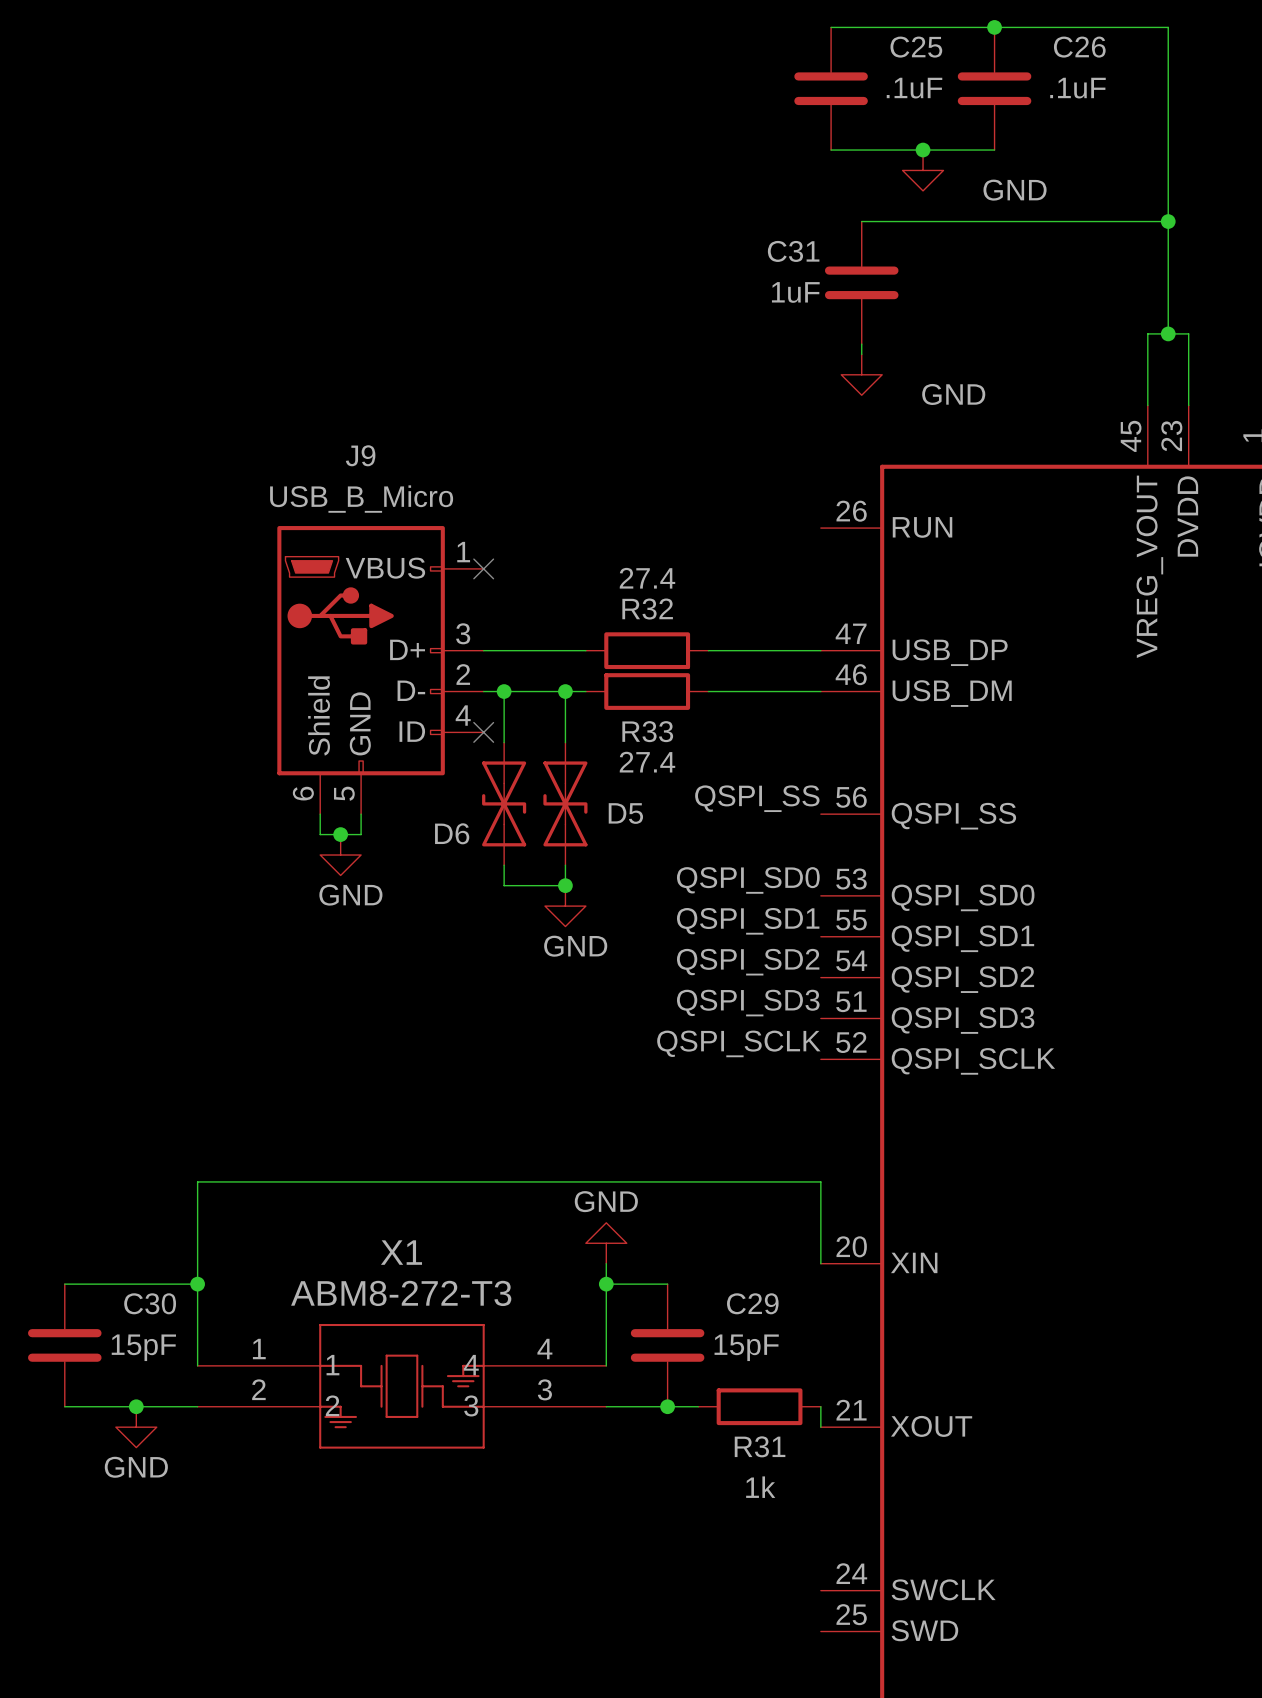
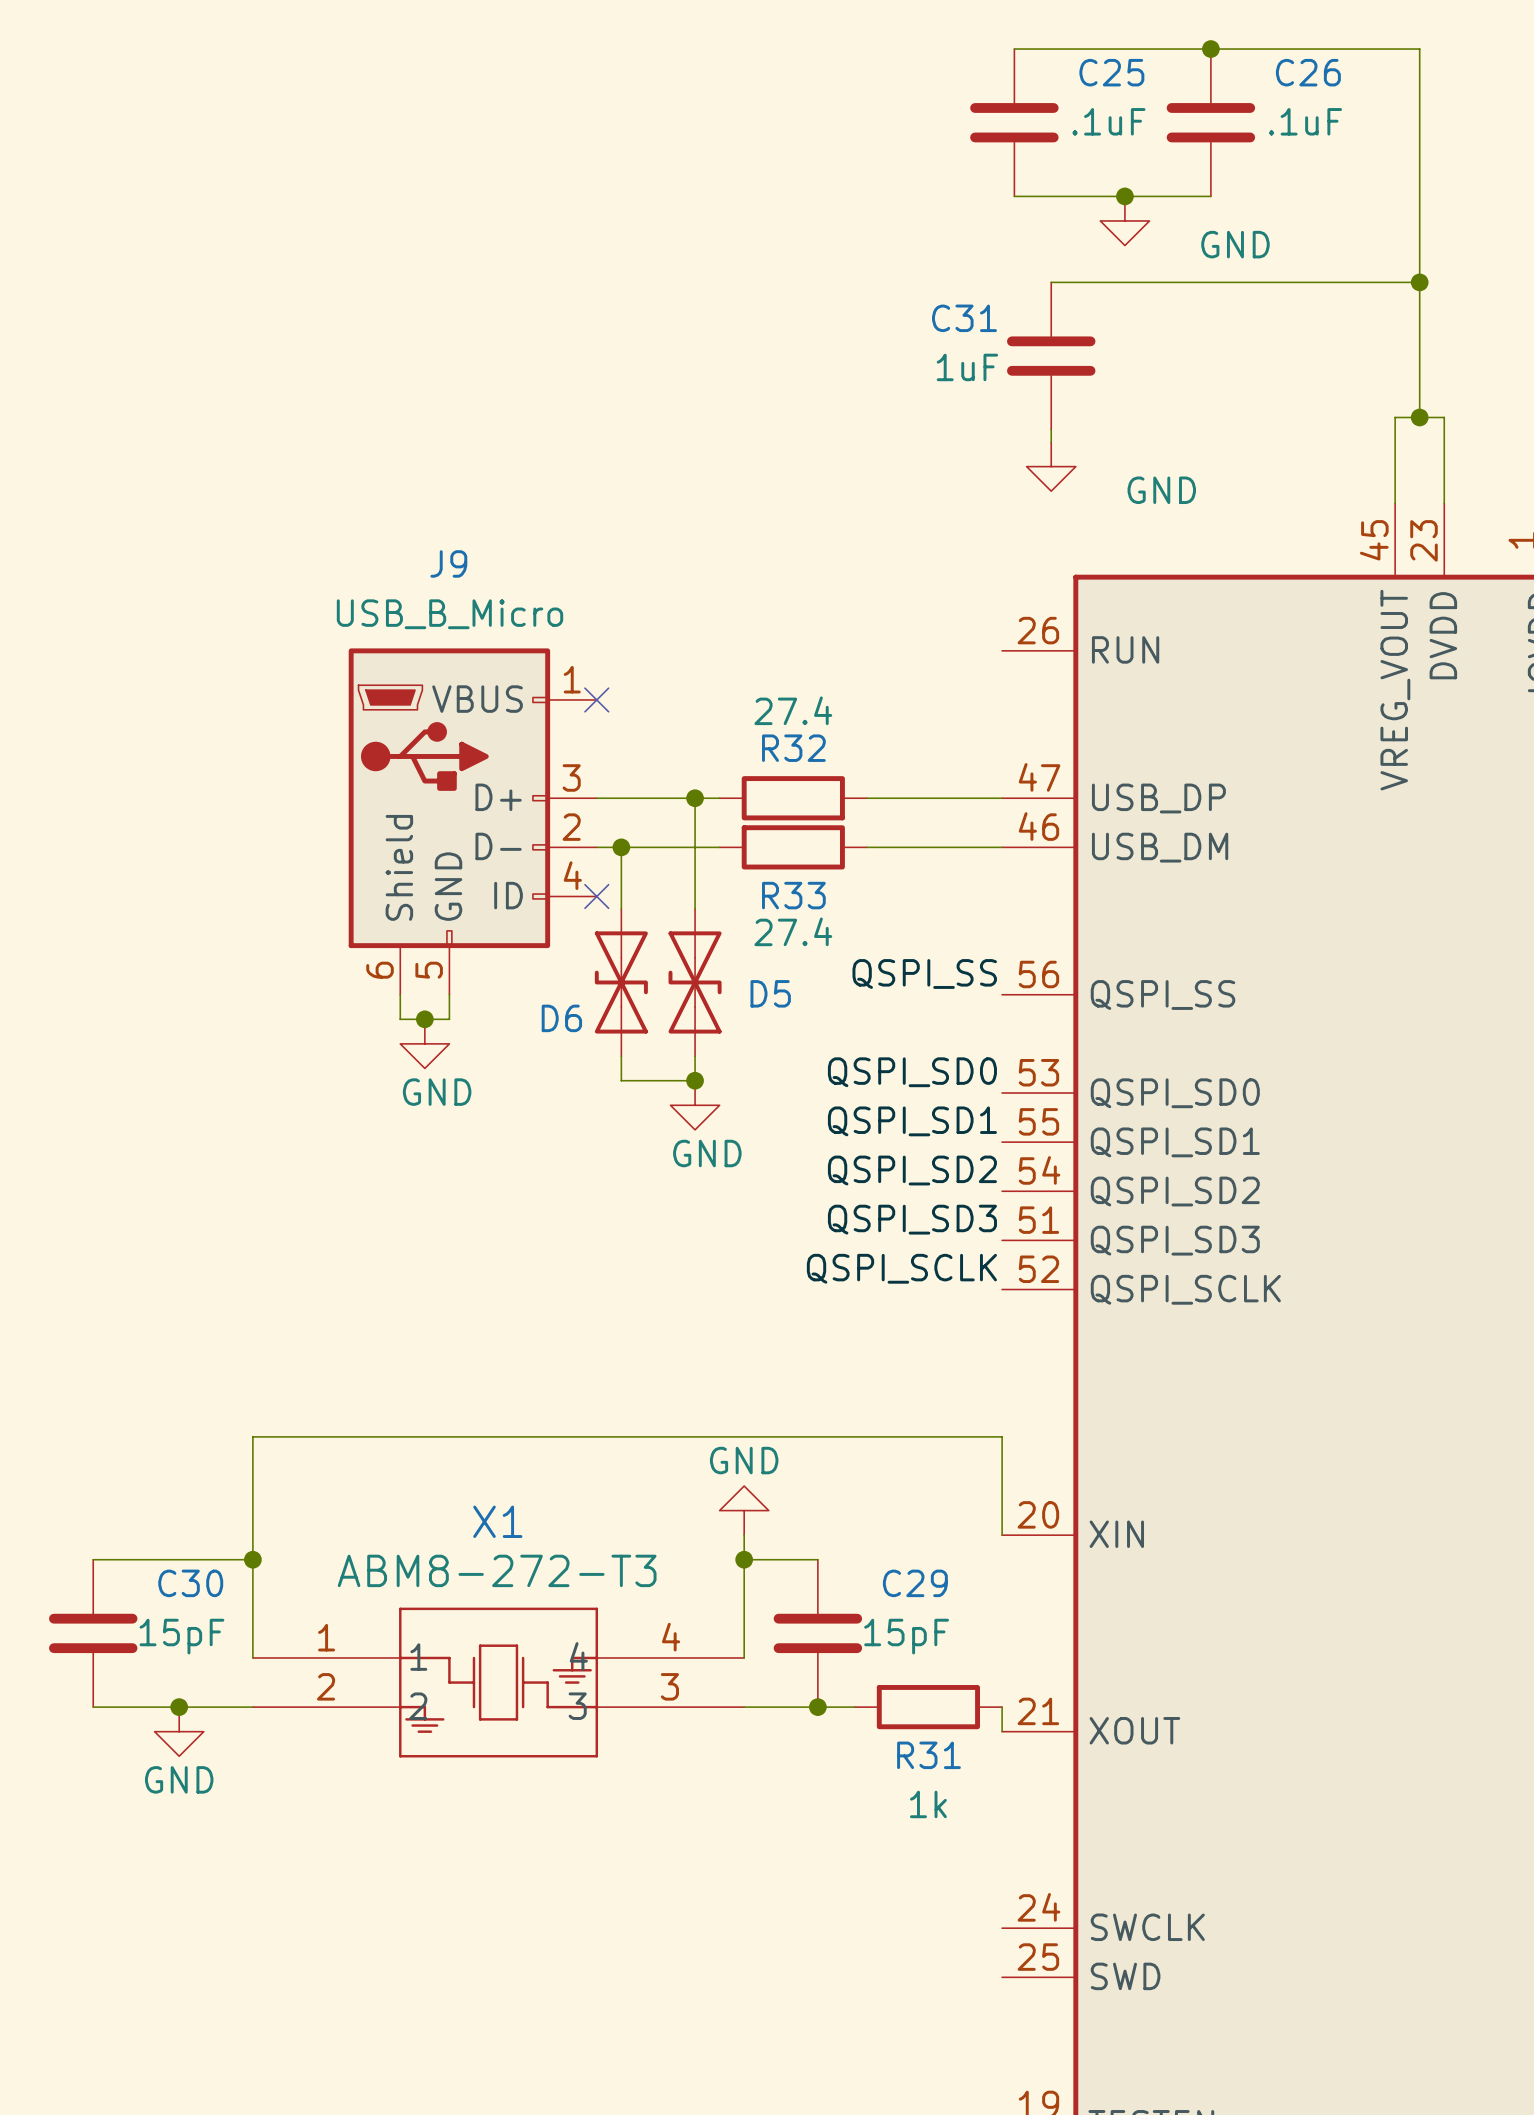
wire: none -> (695, 798) (695, 847)
junction position: (565, 691) -> (695, 798)

